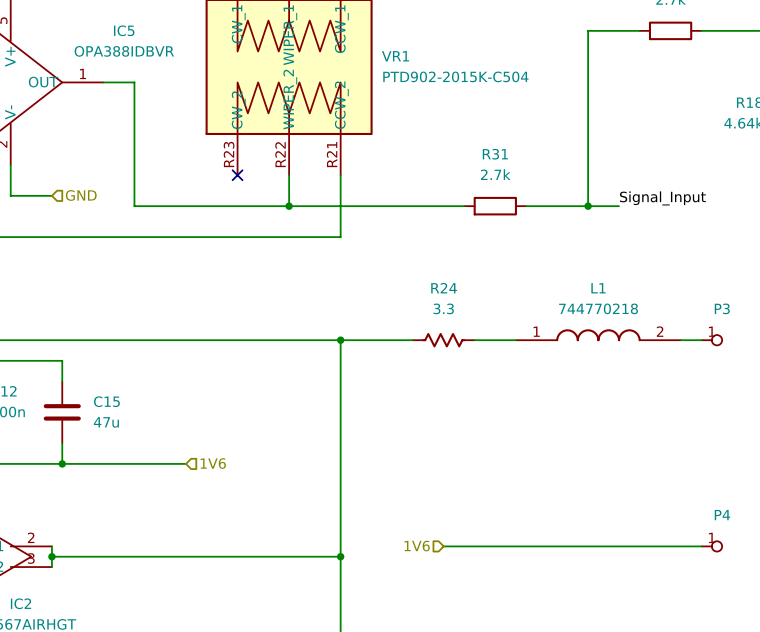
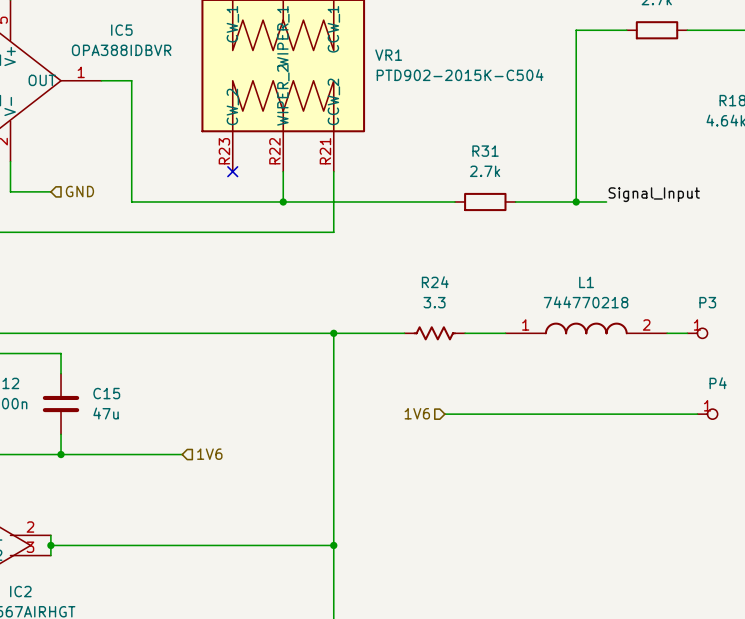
hierarchical label position: 1V6 (417, 546) -> 1V6 (417, 413)
wire: (443, 546) (701, 546) -> (444, 414) (697, 414)
P4 position: (711, 546) -> (707, 414)

